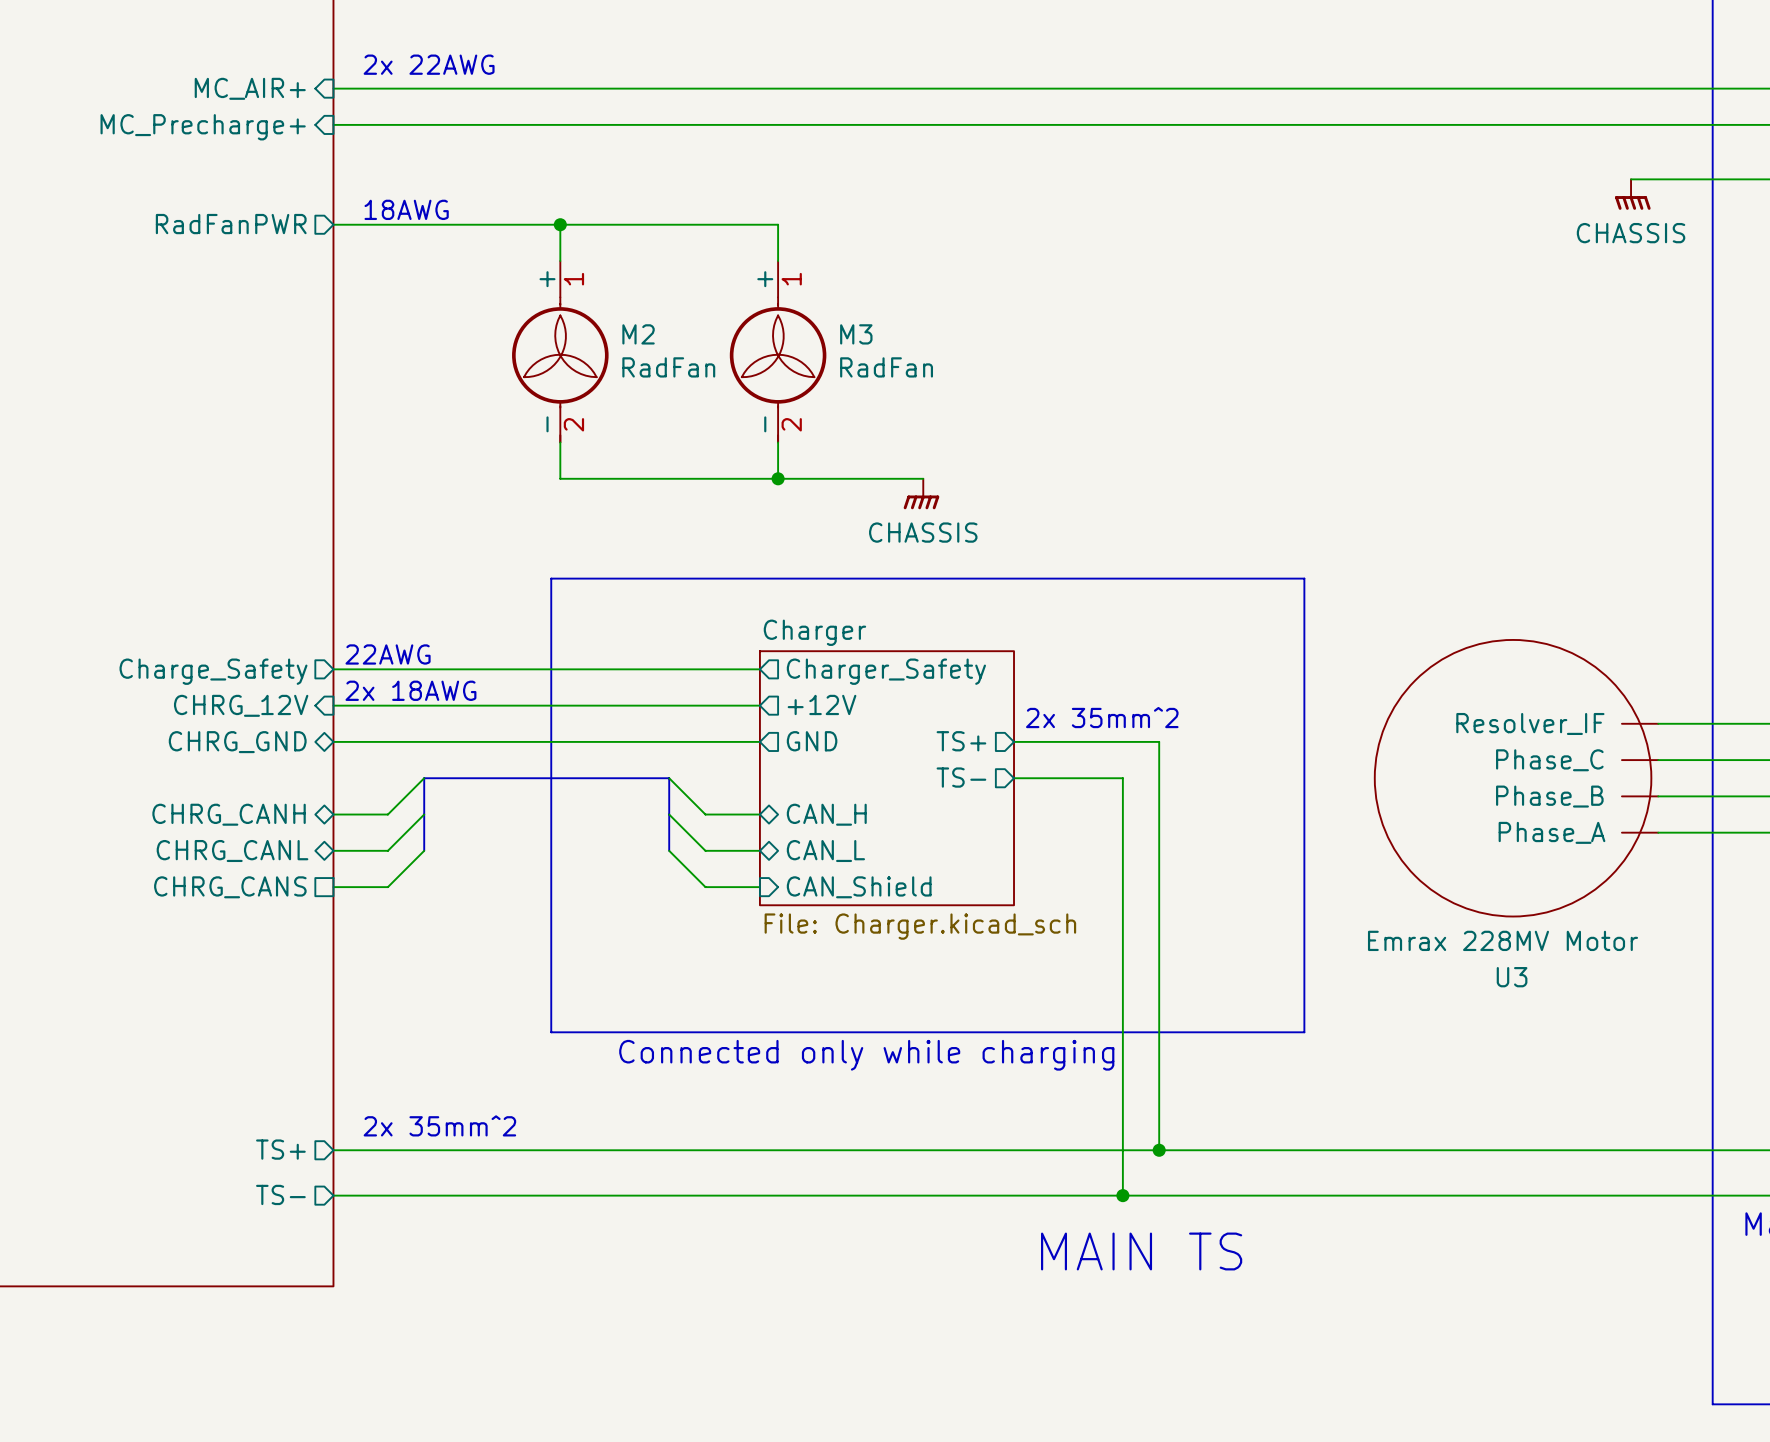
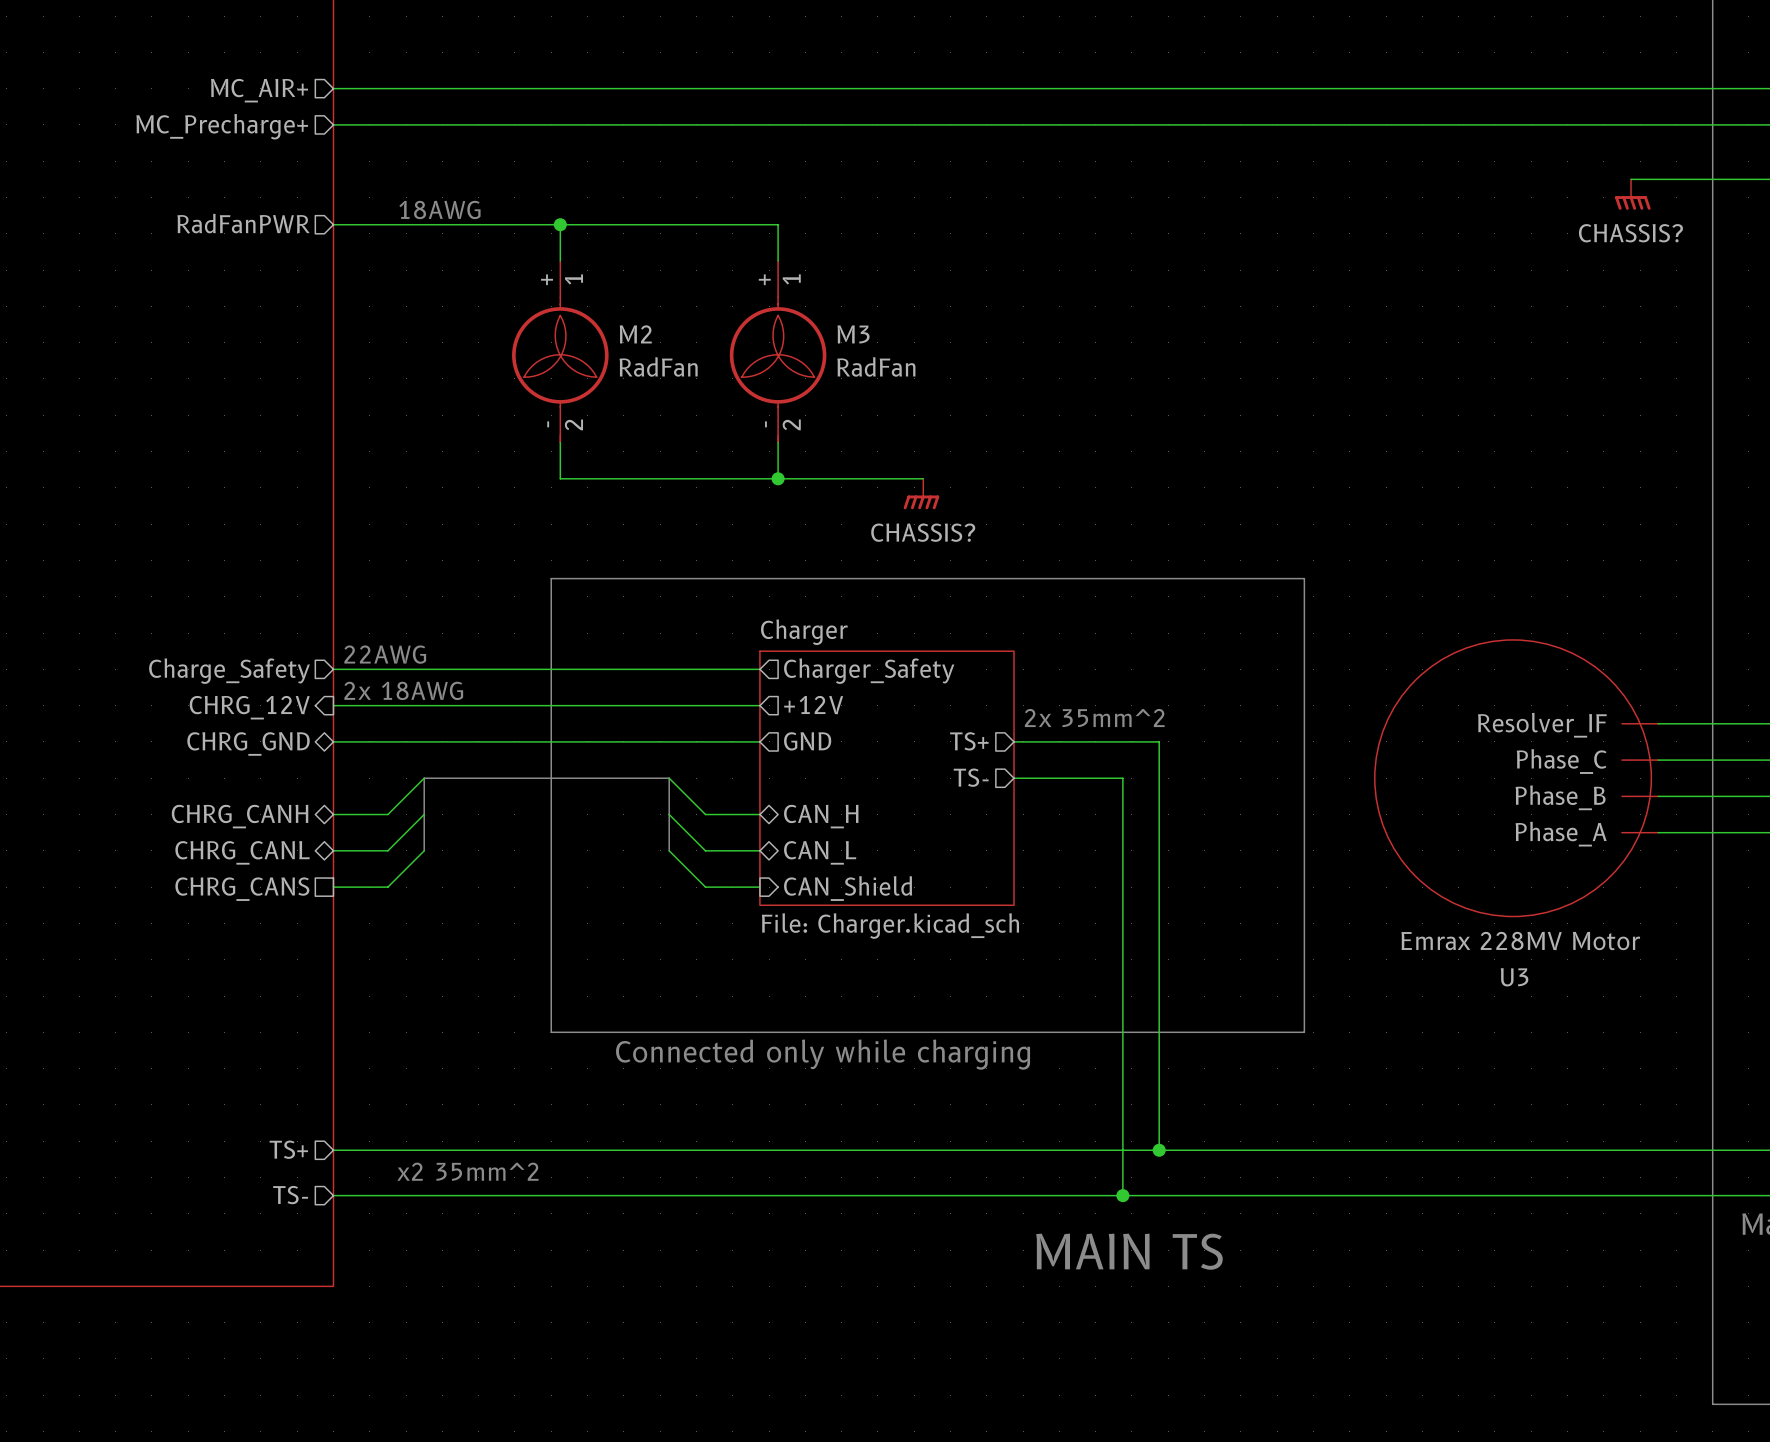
text: 2x 22AWG (429, 64) -> none
sheet pin shape: input (250, 88) -> output (259, 90)
sheet pin shape: input (203, 127) -> output (222, 126)
text position: 18AWG (406, 209) -> 18AWG (439, 209)
CHASSIS name: CHASSIS (1631, 233) -> CHASSIS? (1630, 233)
CHASSIS name: CHASSIS (923, 532) -> CHASSIS? (923, 532)
text: 2x 35mm^2 (439, 1125) -> none
text: none -> x2 35mm^2 (467, 1171)

